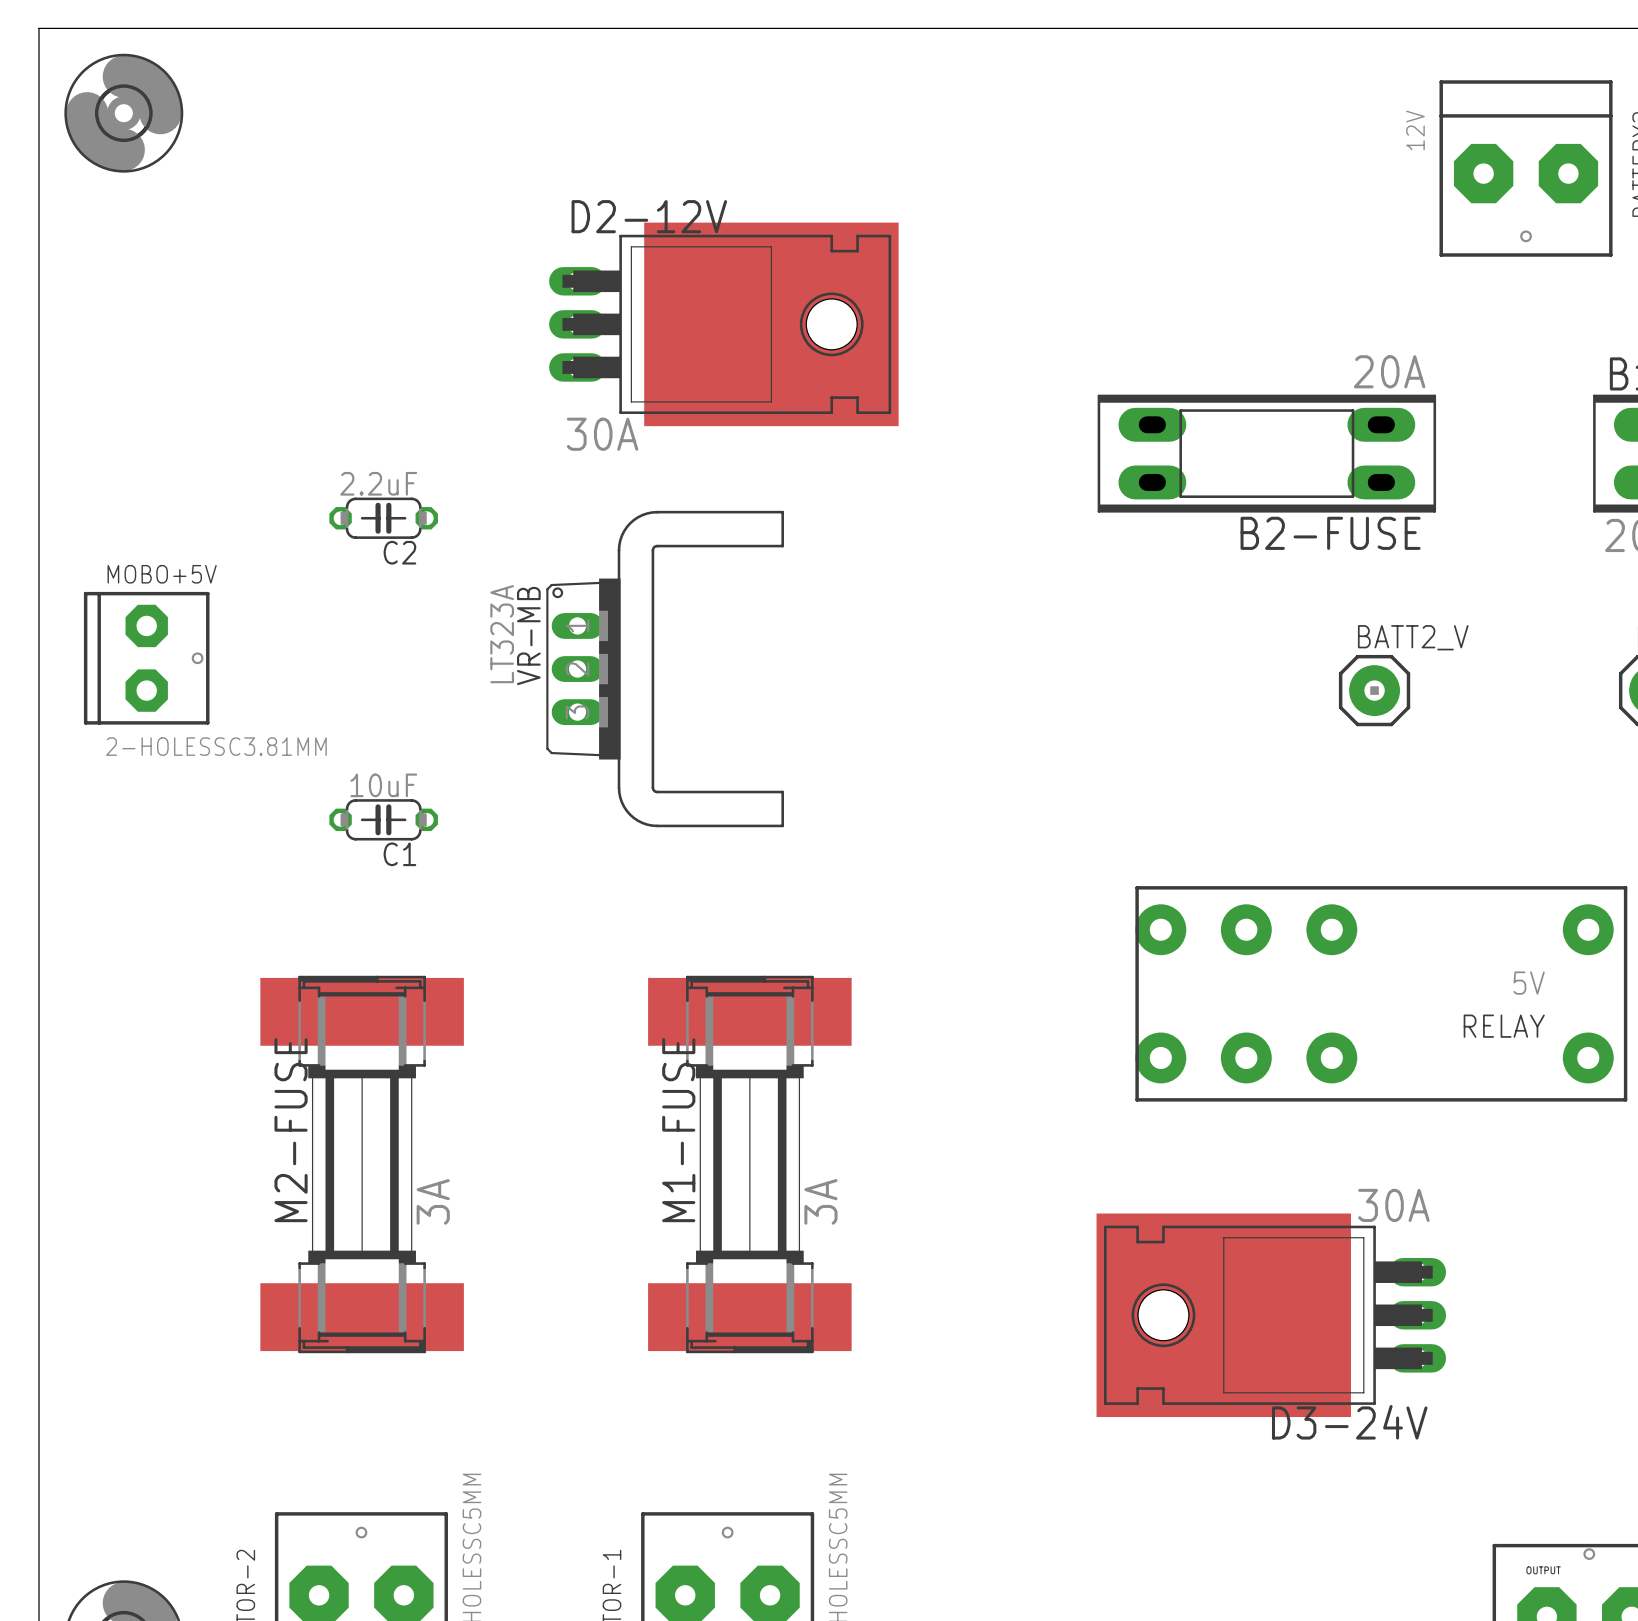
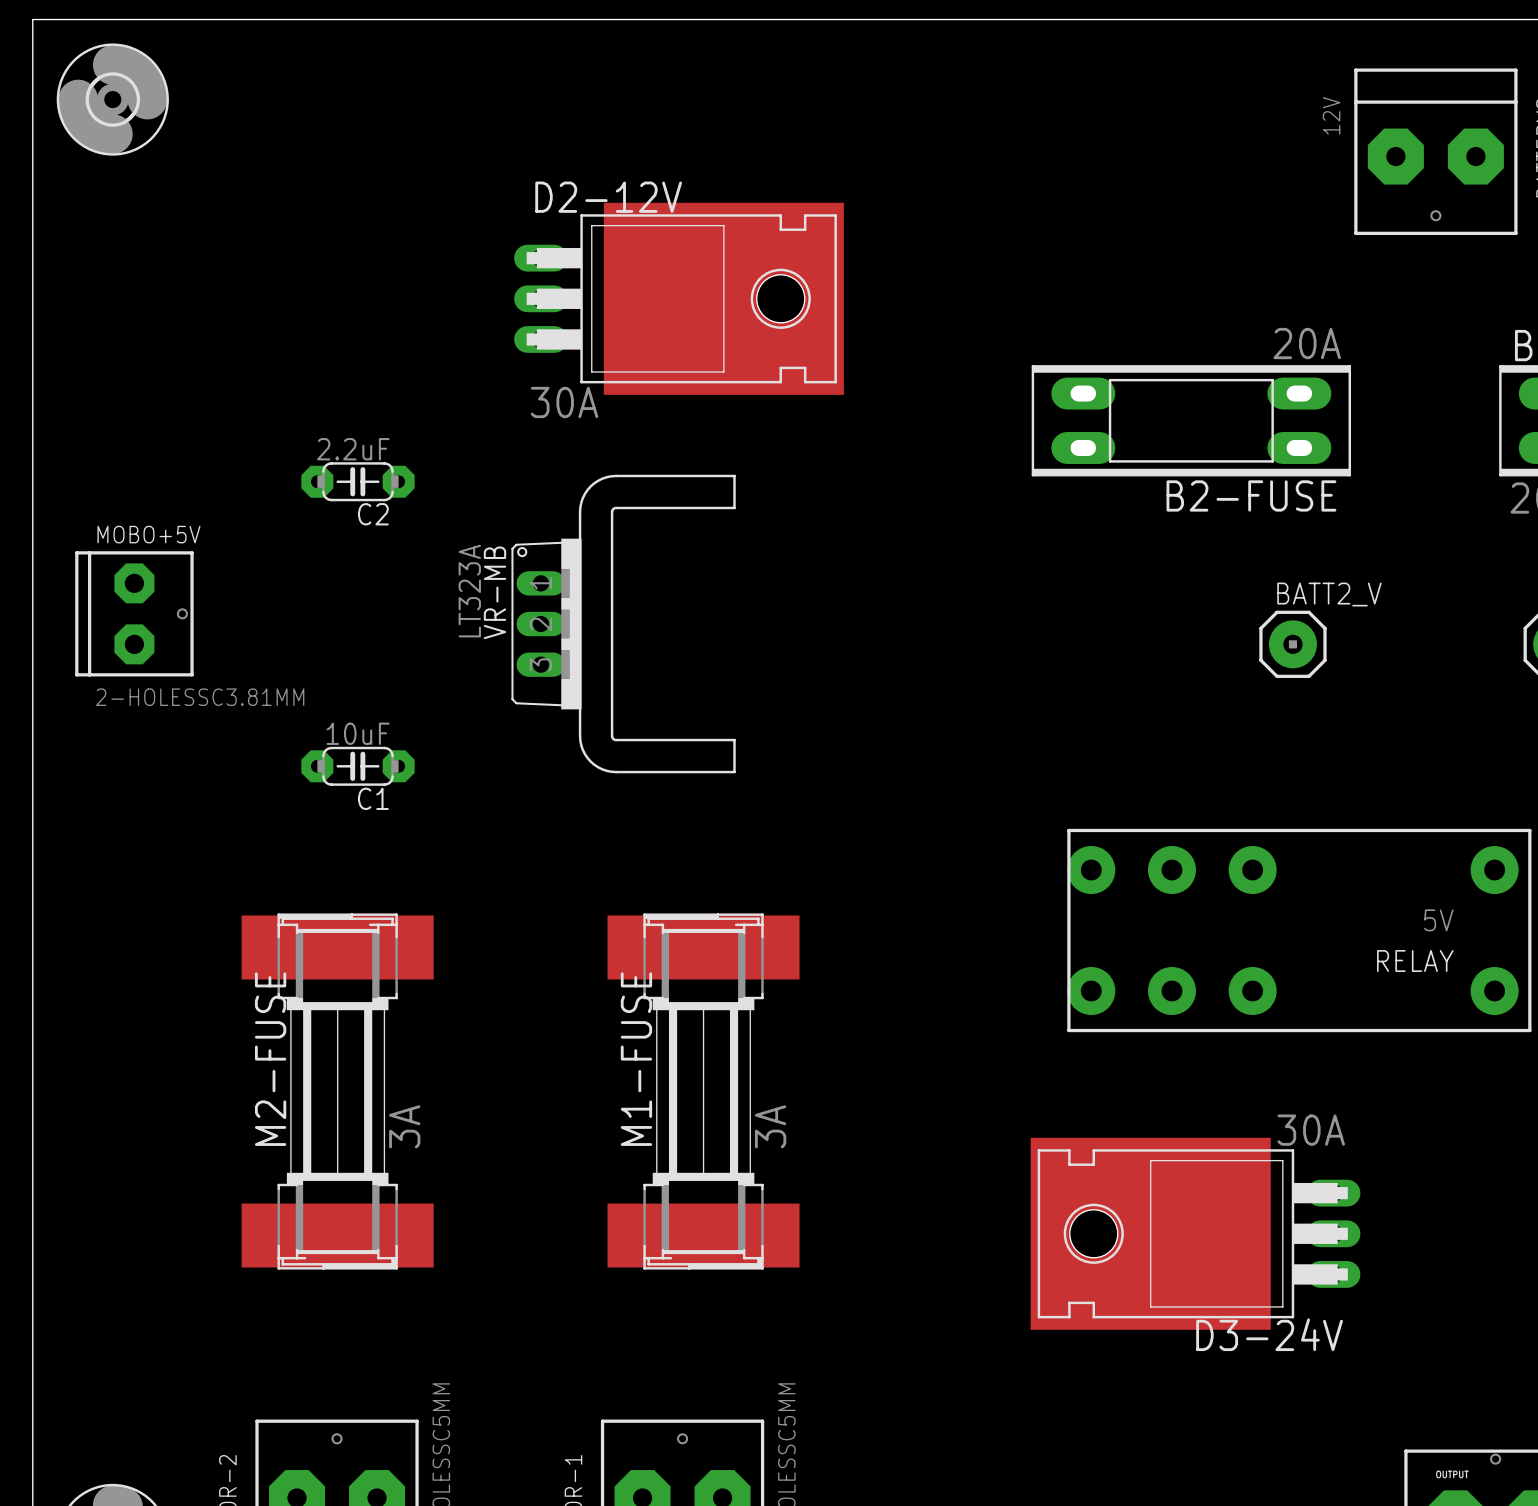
C2 footprint: [329, 497, 438, 539] -> [301, 462, 415, 502]
C1 footprint: [329, 799, 438, 841] -> [301, 746, 415, 786]

